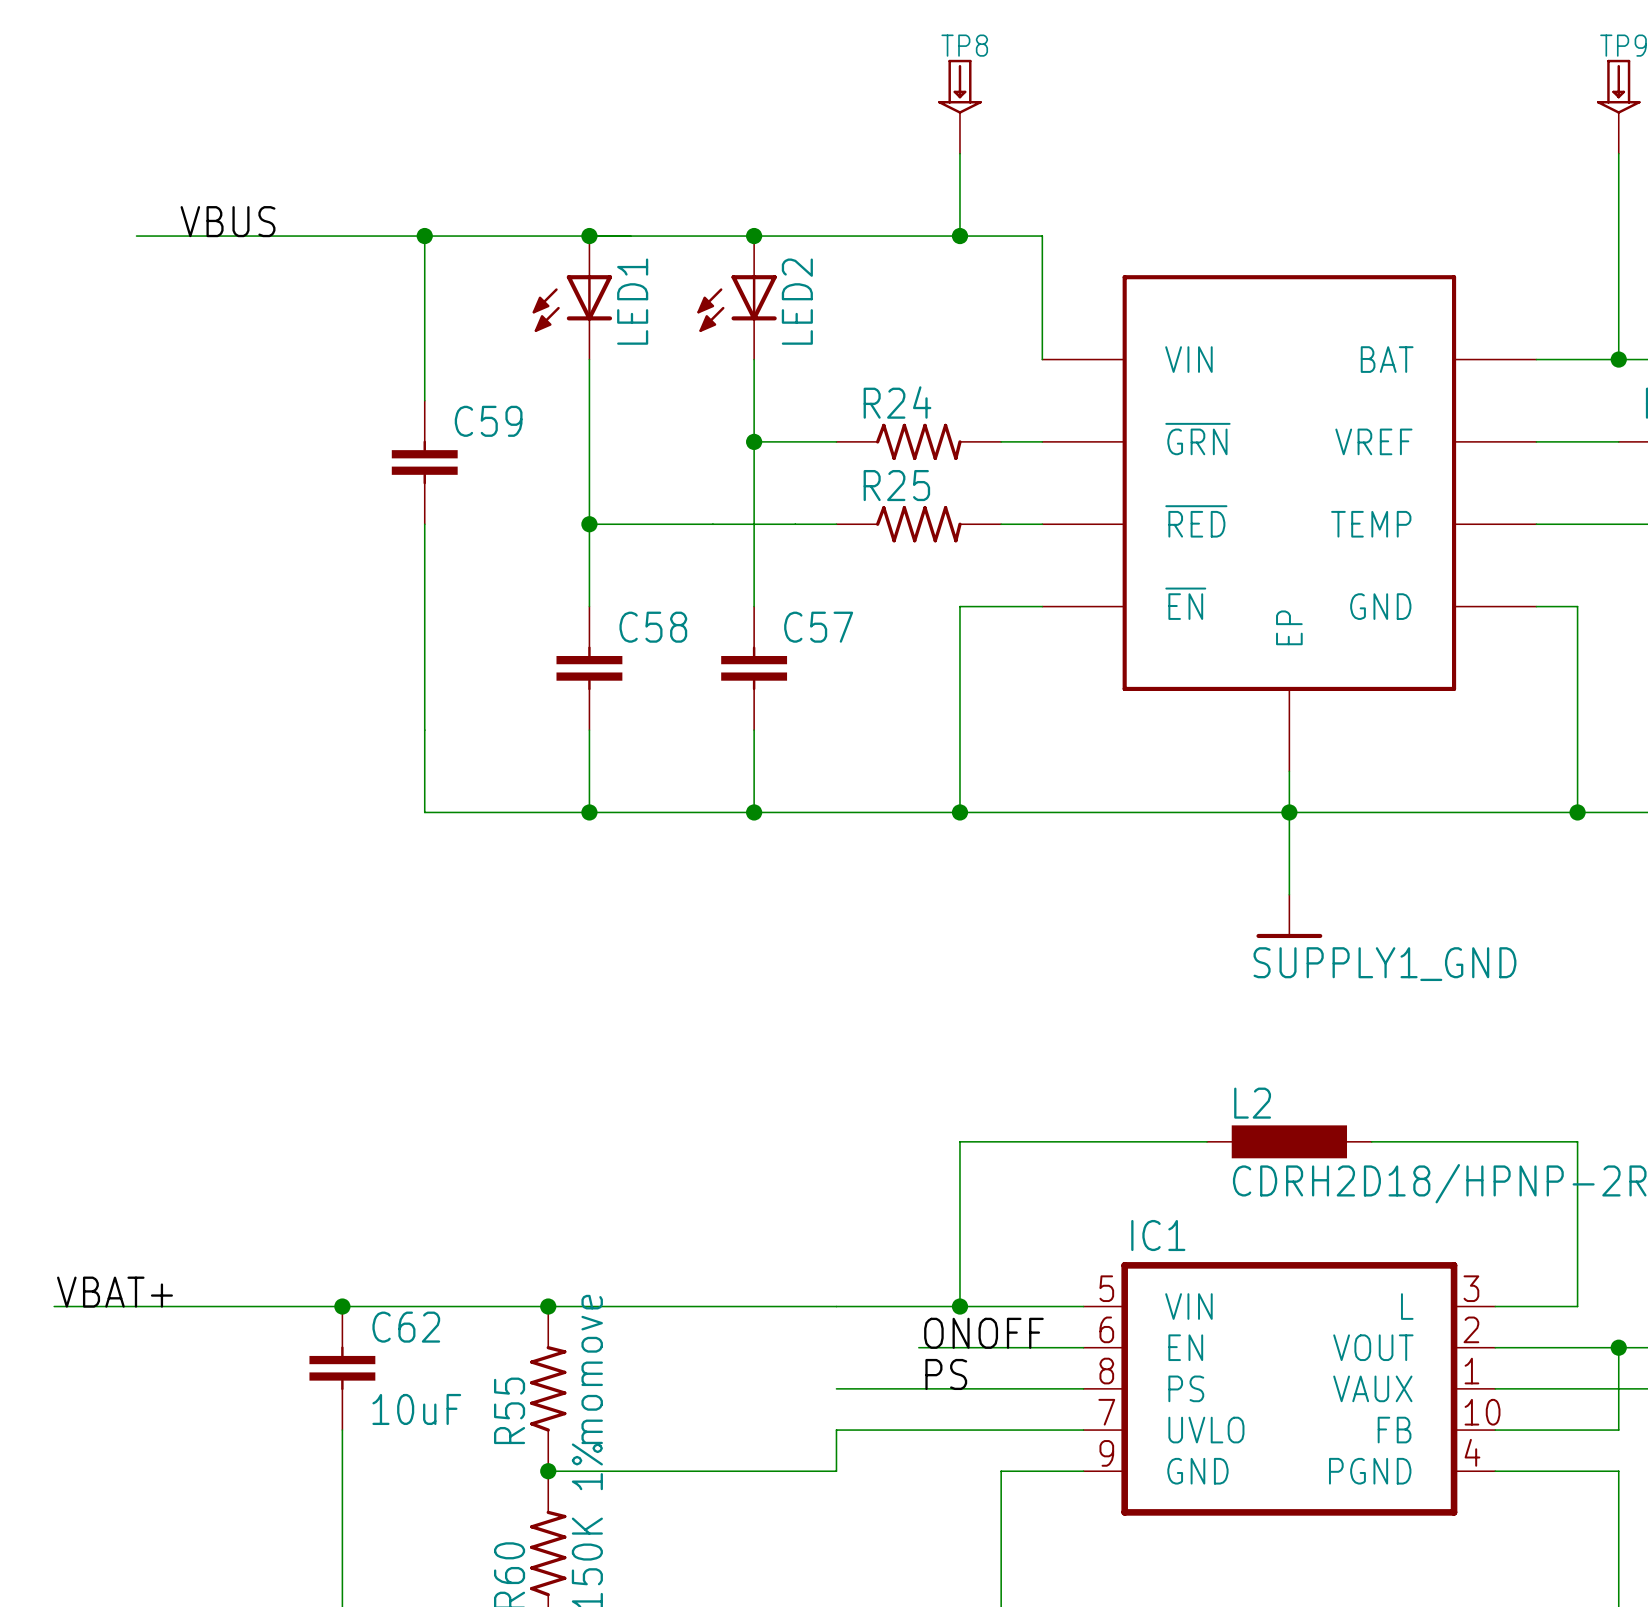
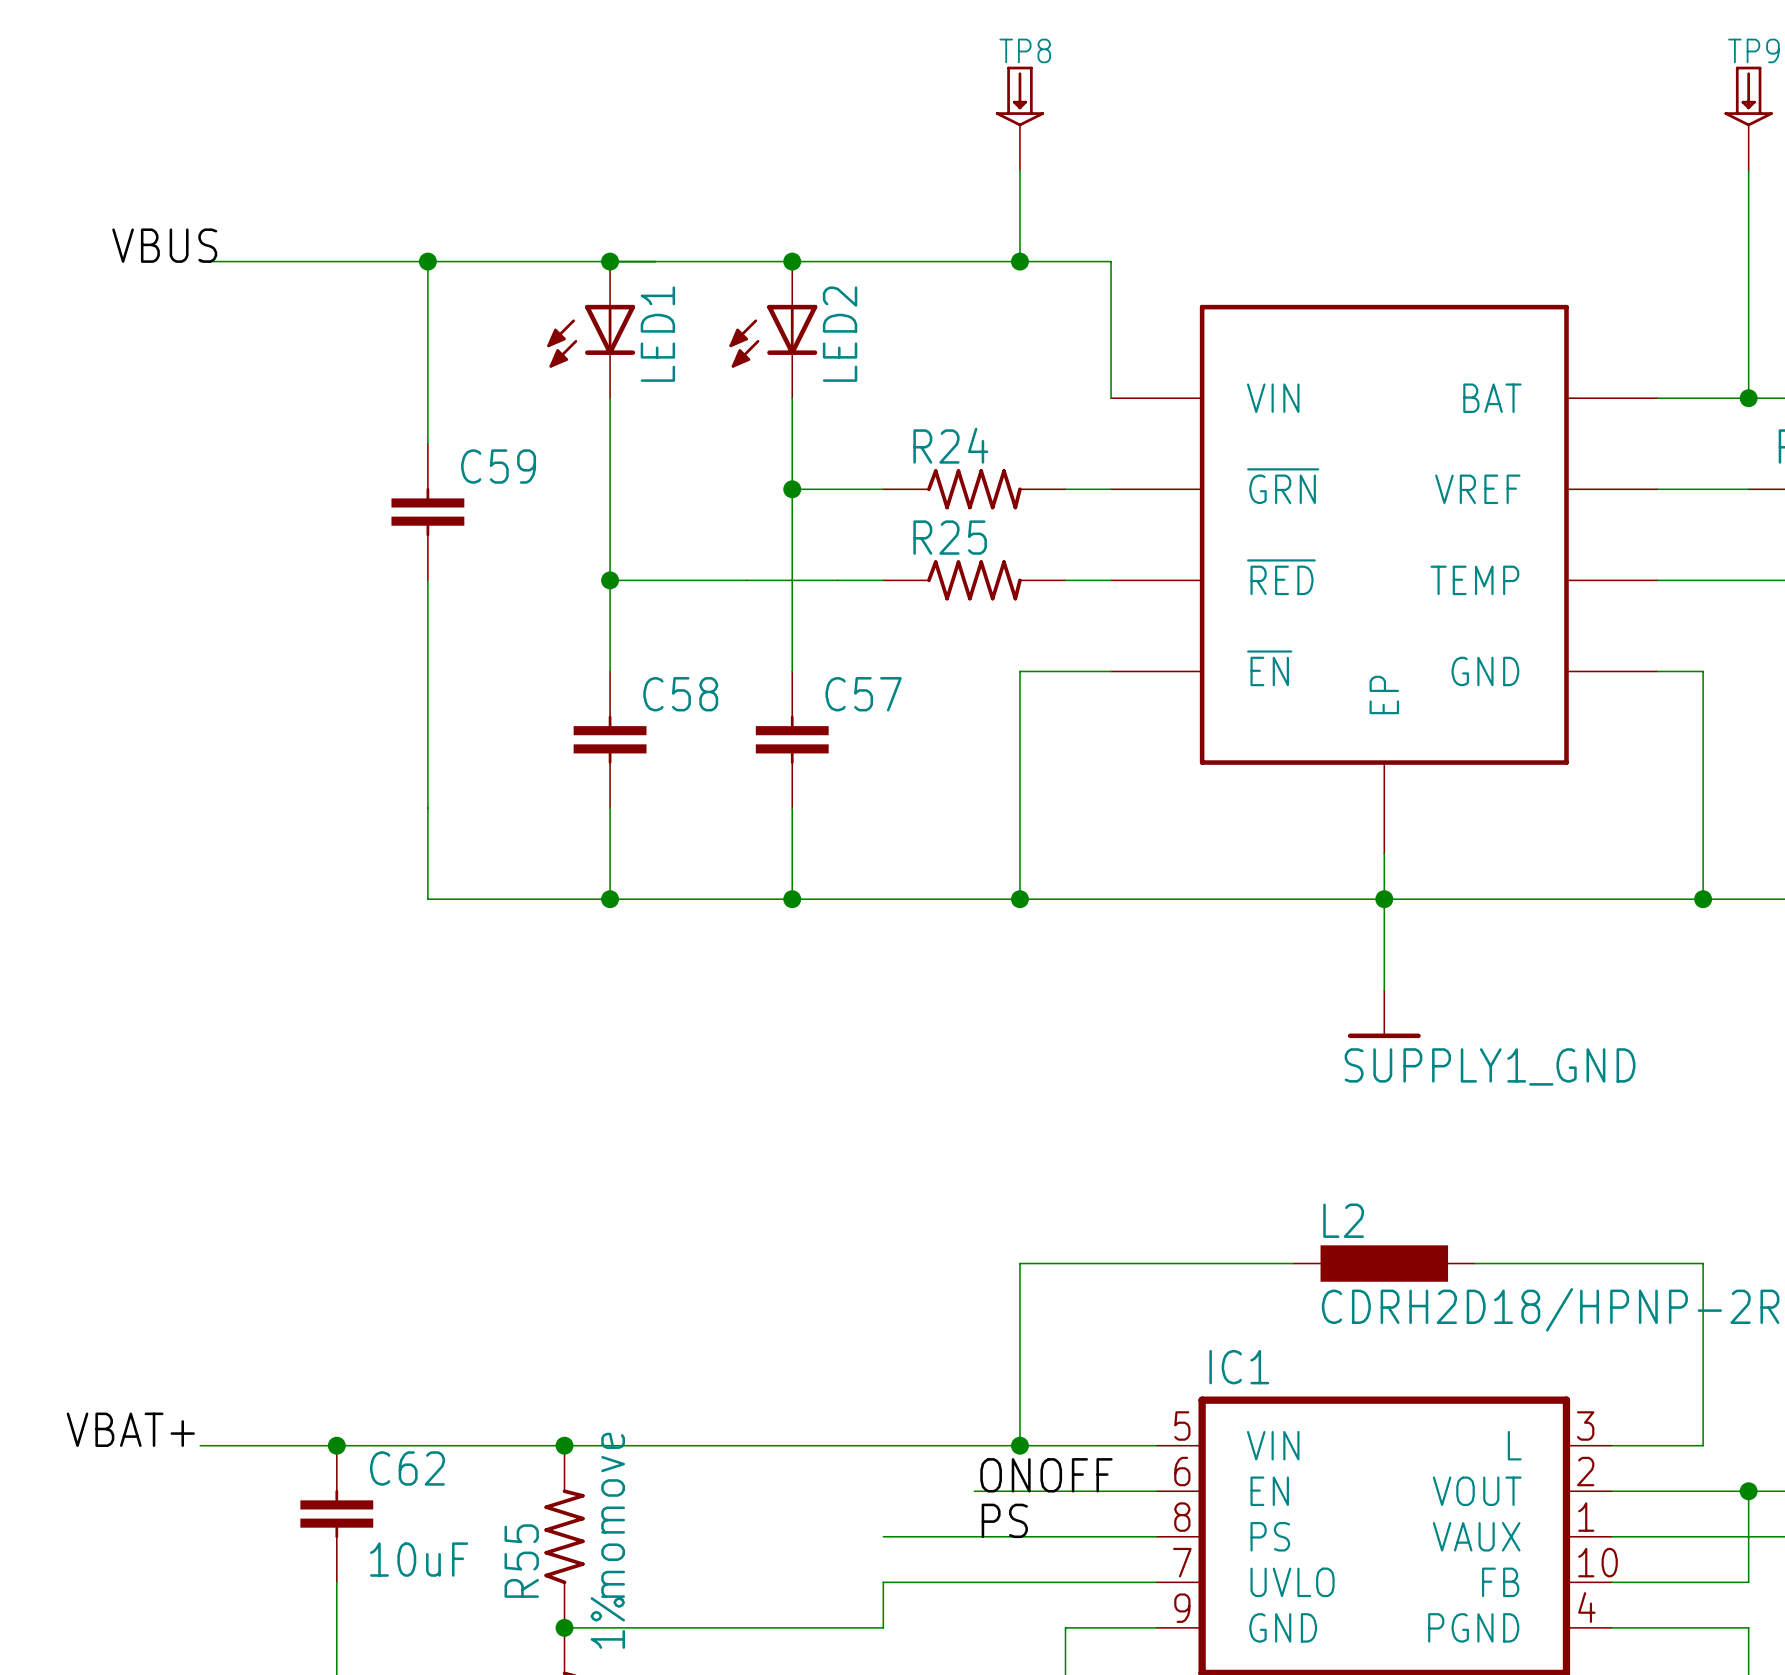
label position: VBUS (228, 221) -> VBUS (164, 245)
wire: (136, 236) (218, 236) -> none
label position: VBAT+ (114, 1292) -> VBAT+ (130, 1429)
wire: (54, 1306) (218, 1306) -> none

